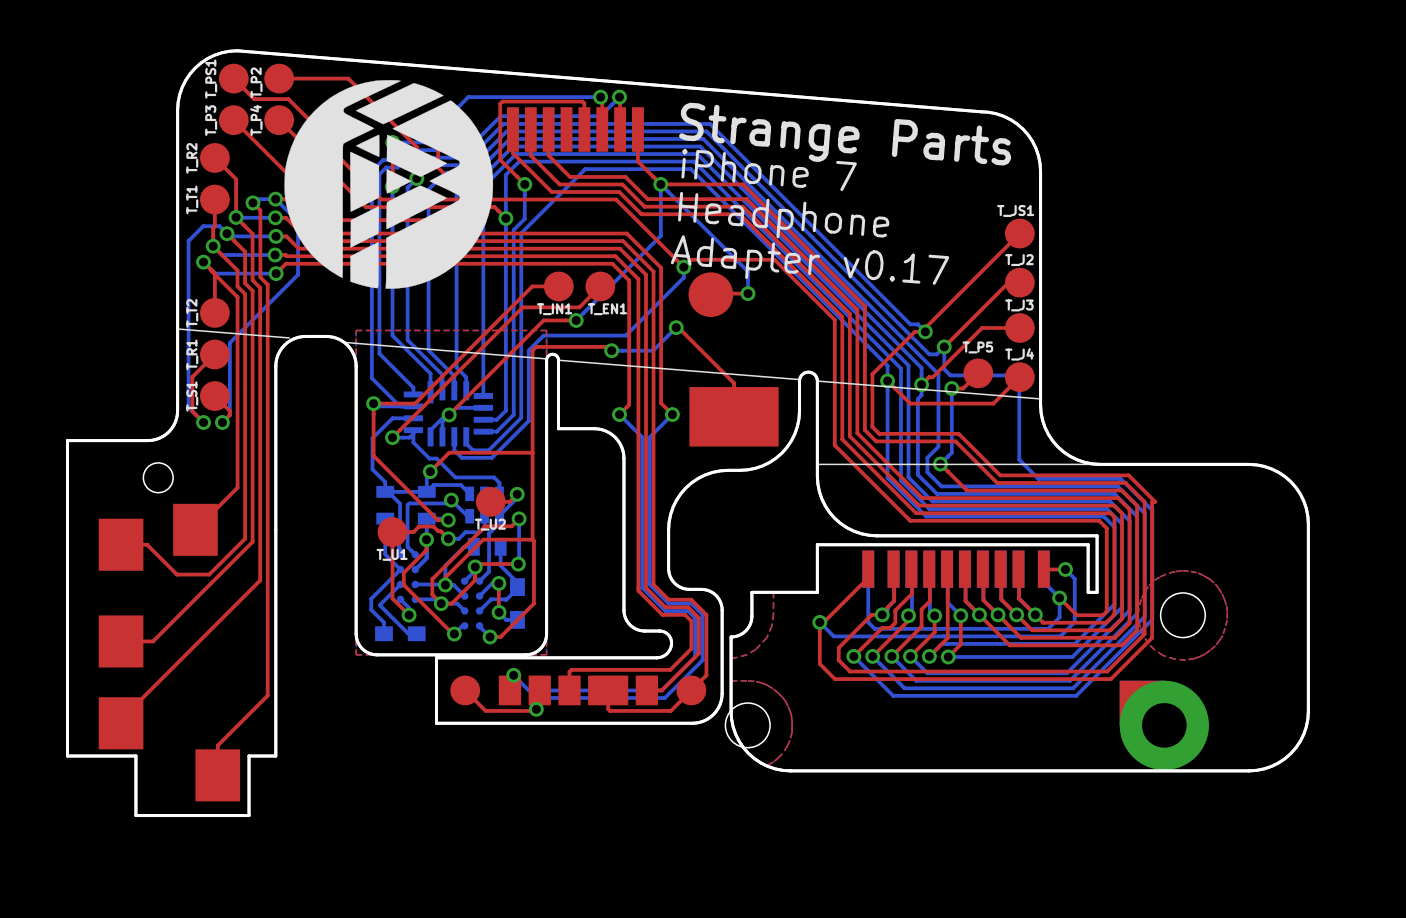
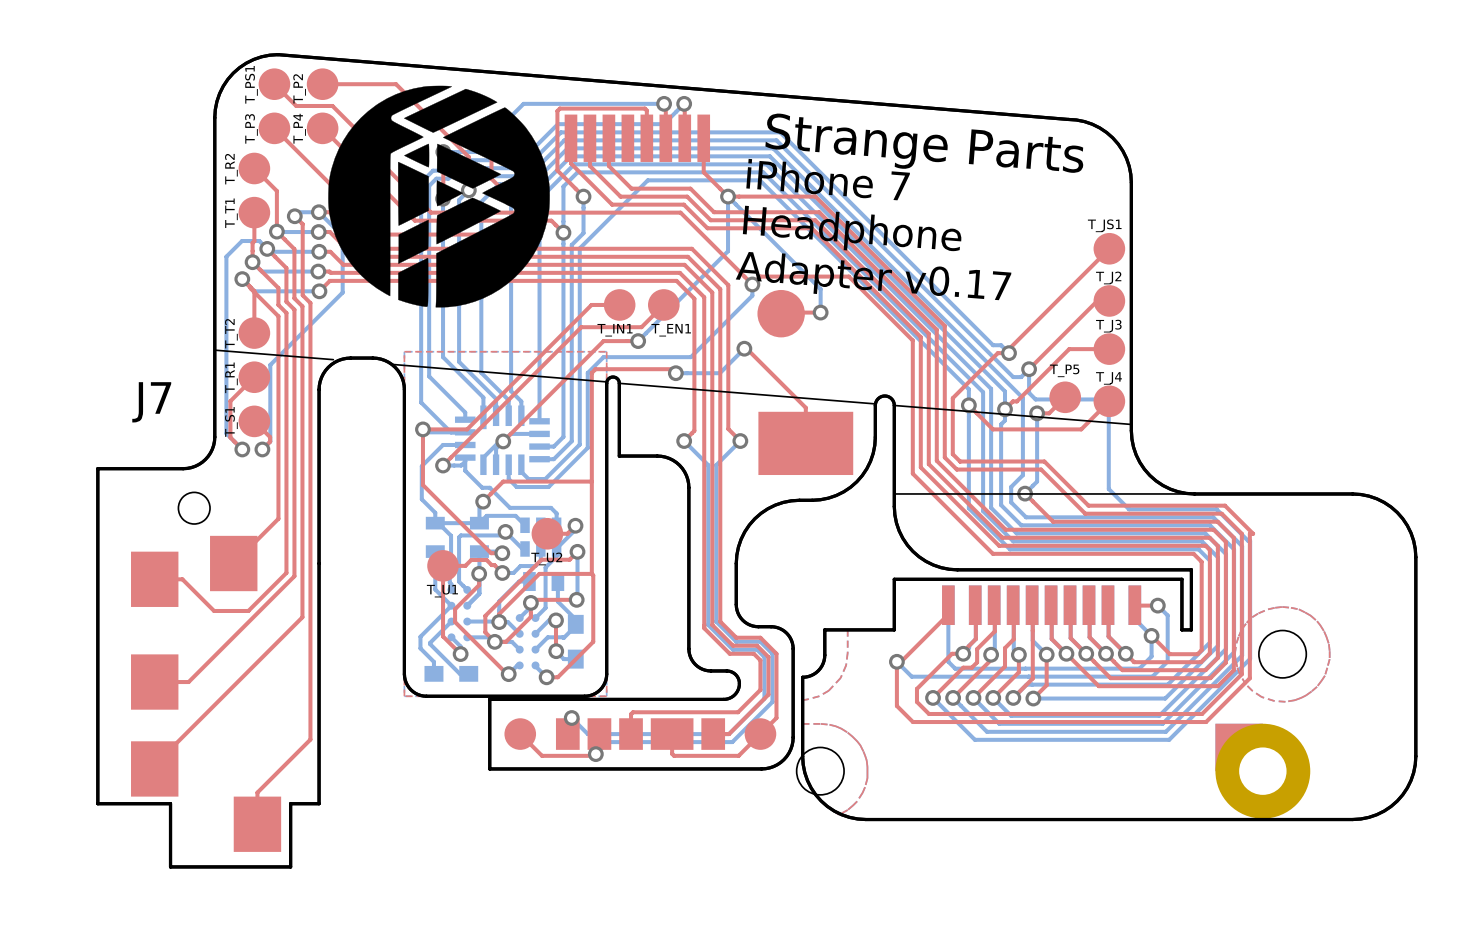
J7 name: none -> J7 (151, 402)

